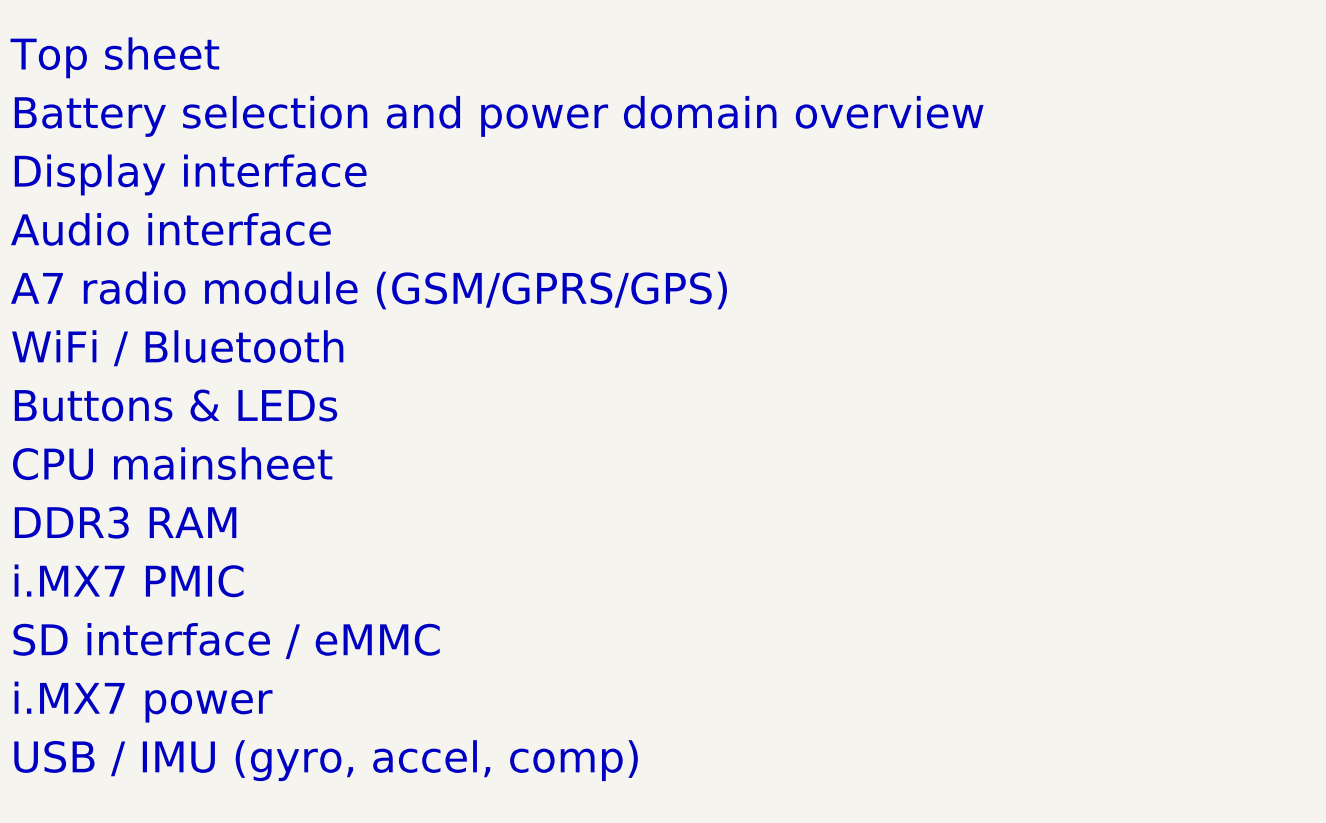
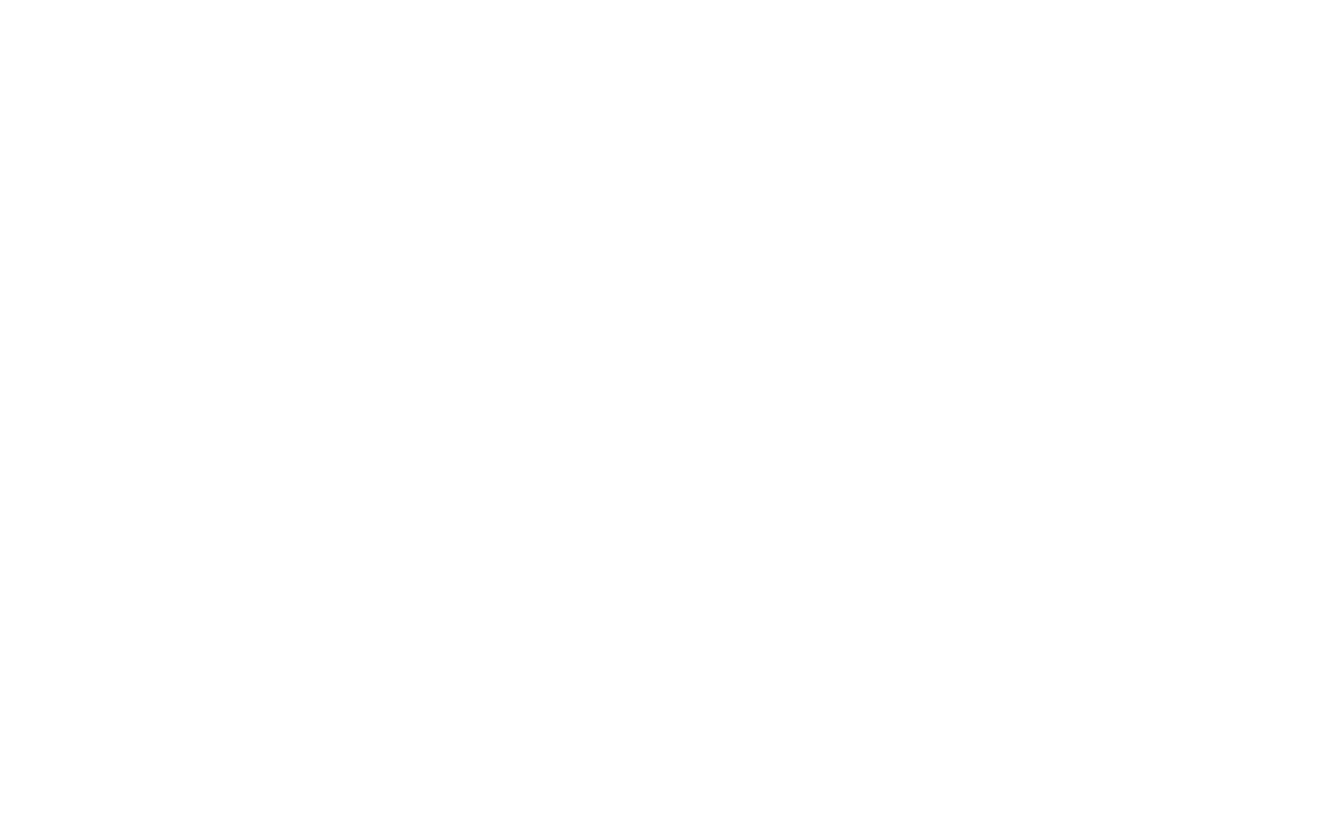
text: Top sheet (114, 57) -> none
text: Battery selection and power domain overview (499, 116) -> none
text: Display interface (190, 174) -> none
text: Audio interface (170, 229) -> none
text: A7 radio module (GSM/GPRS/GPS) (368, 290) -> none
text: WiFi / Bluetooth (177, 348) -> none
text: Buttons & LEDs (175, 405) -> none
text: CPU mainsheet (172, 463) -> none
text: DDR3 RAM (125, 522) -> none
text: i.MX7 PMIC (129, 580) -> none
text: SD interface / eMMC (226, 641) -> none
text: i.MX7 power (143, 702) -> none
text: USB / IMU (gyro, accel, comp) (326, 760) -> none

